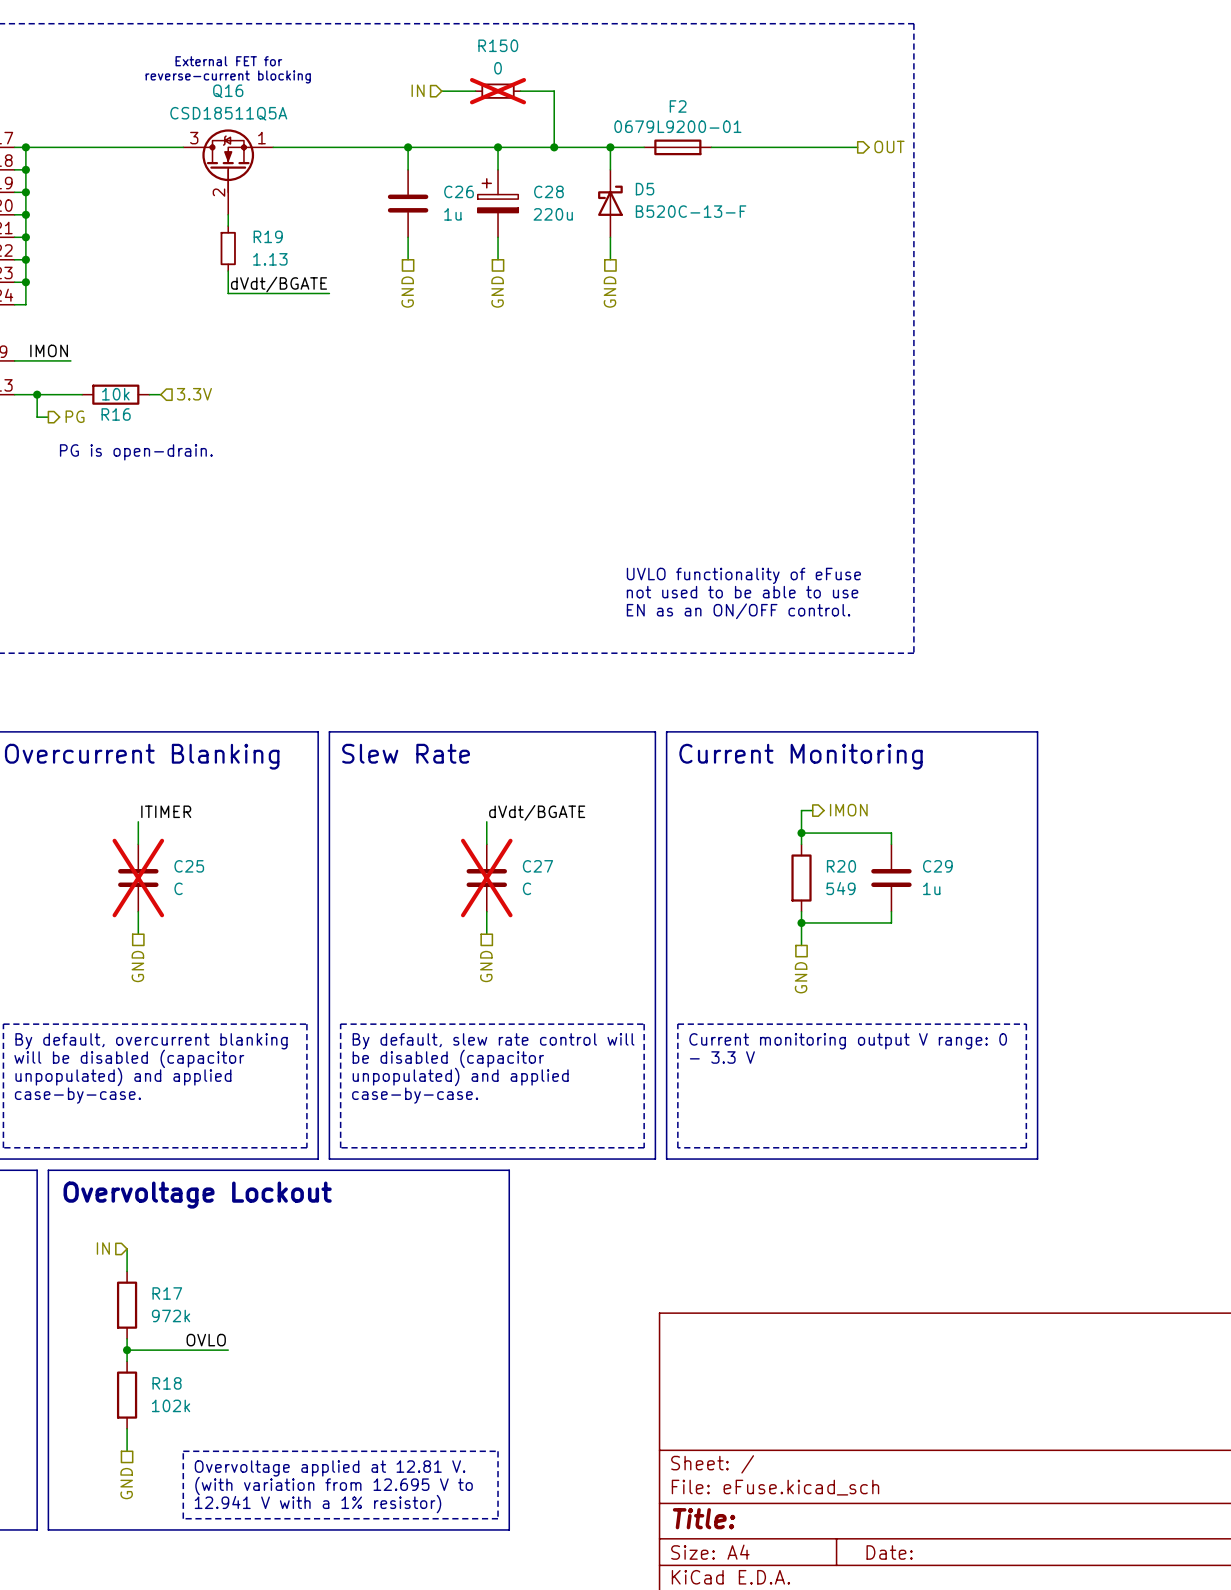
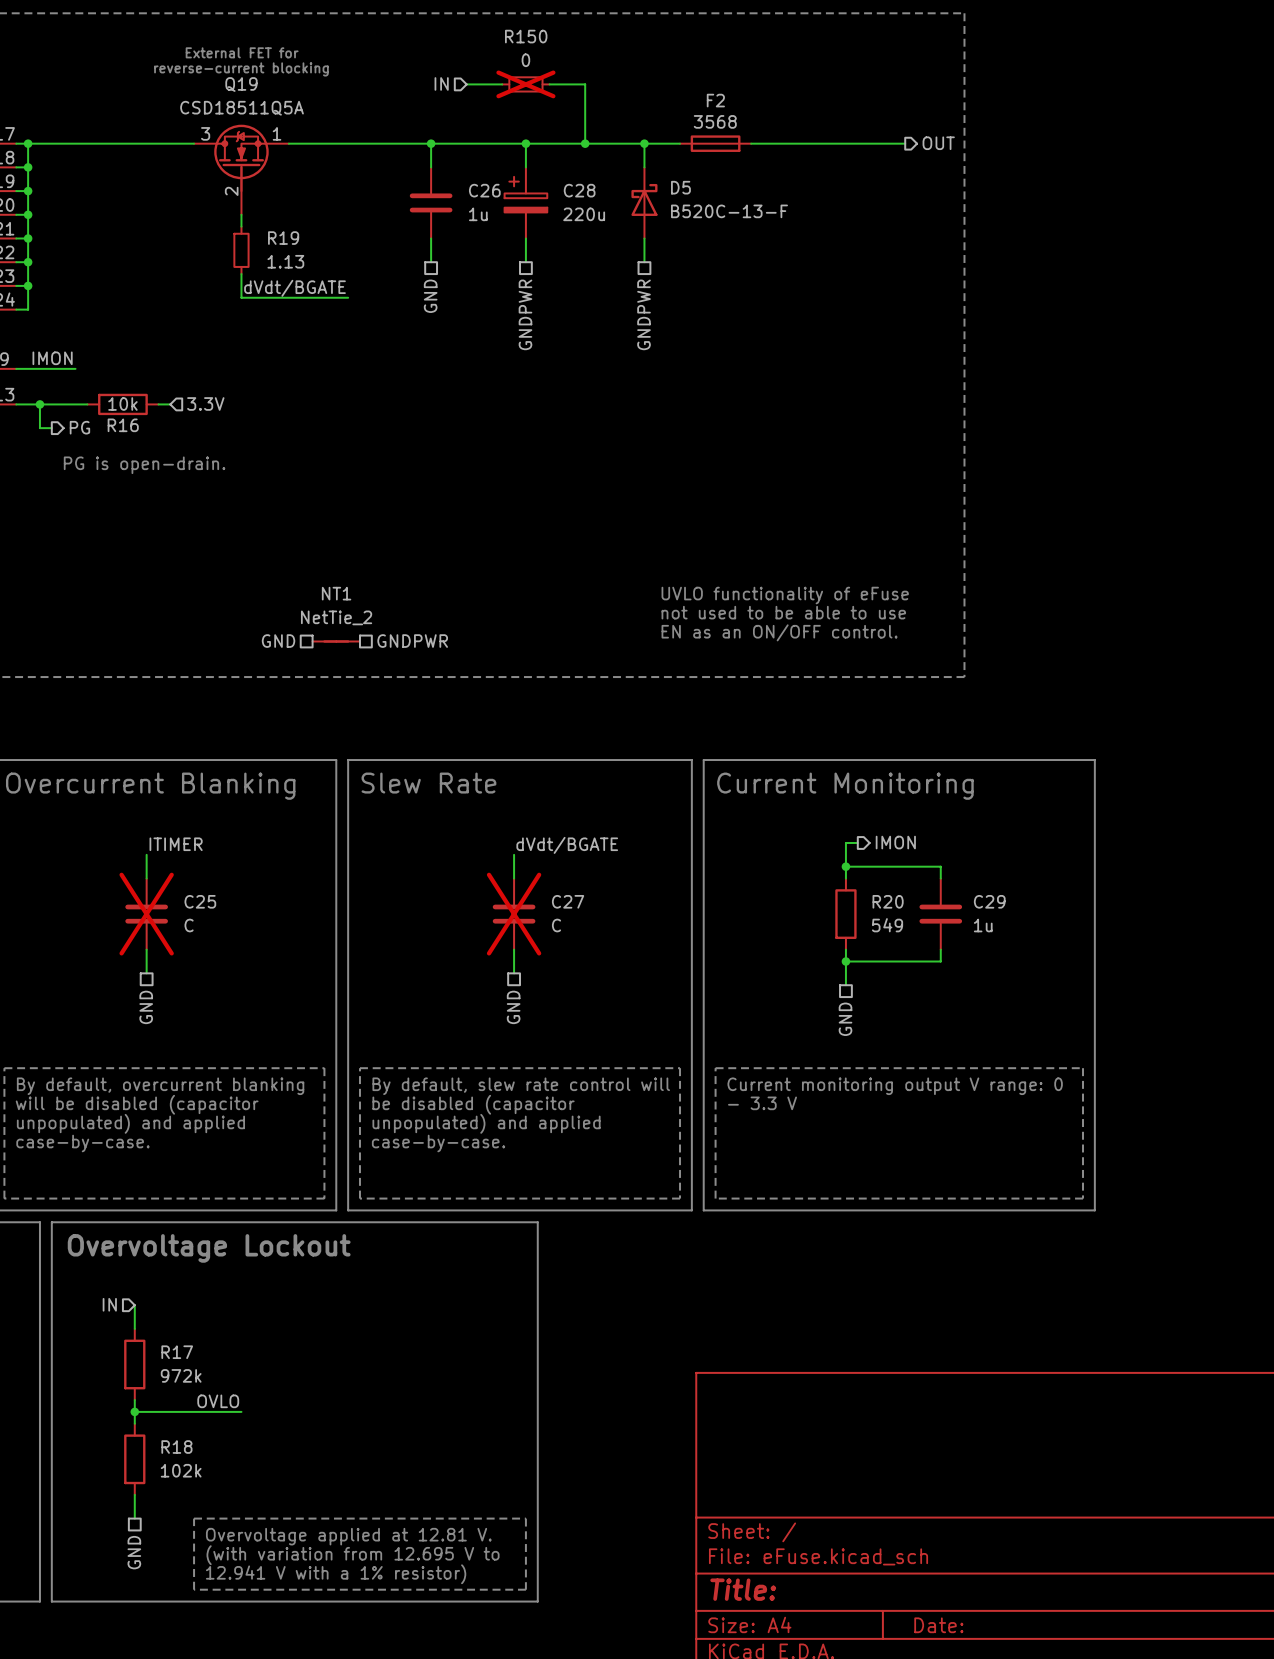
Q16 name: Q16 (228, 91) -> Q19 (241, 84)
F2 value: 0679L9200-01 (677, 126) -> 3568 (715, 121)
hierarchical label: GND (497, 292) -> GNDPWR (525, 314)
hierarchical label: GND (610, 292) -> GNDPWR (644, 314)
hierarchical label: none -> GND (278, 641)
NT1: none -> NetTie_2 (336, 641)
hierarchical label: none -> GNDPWR (412, 641)

